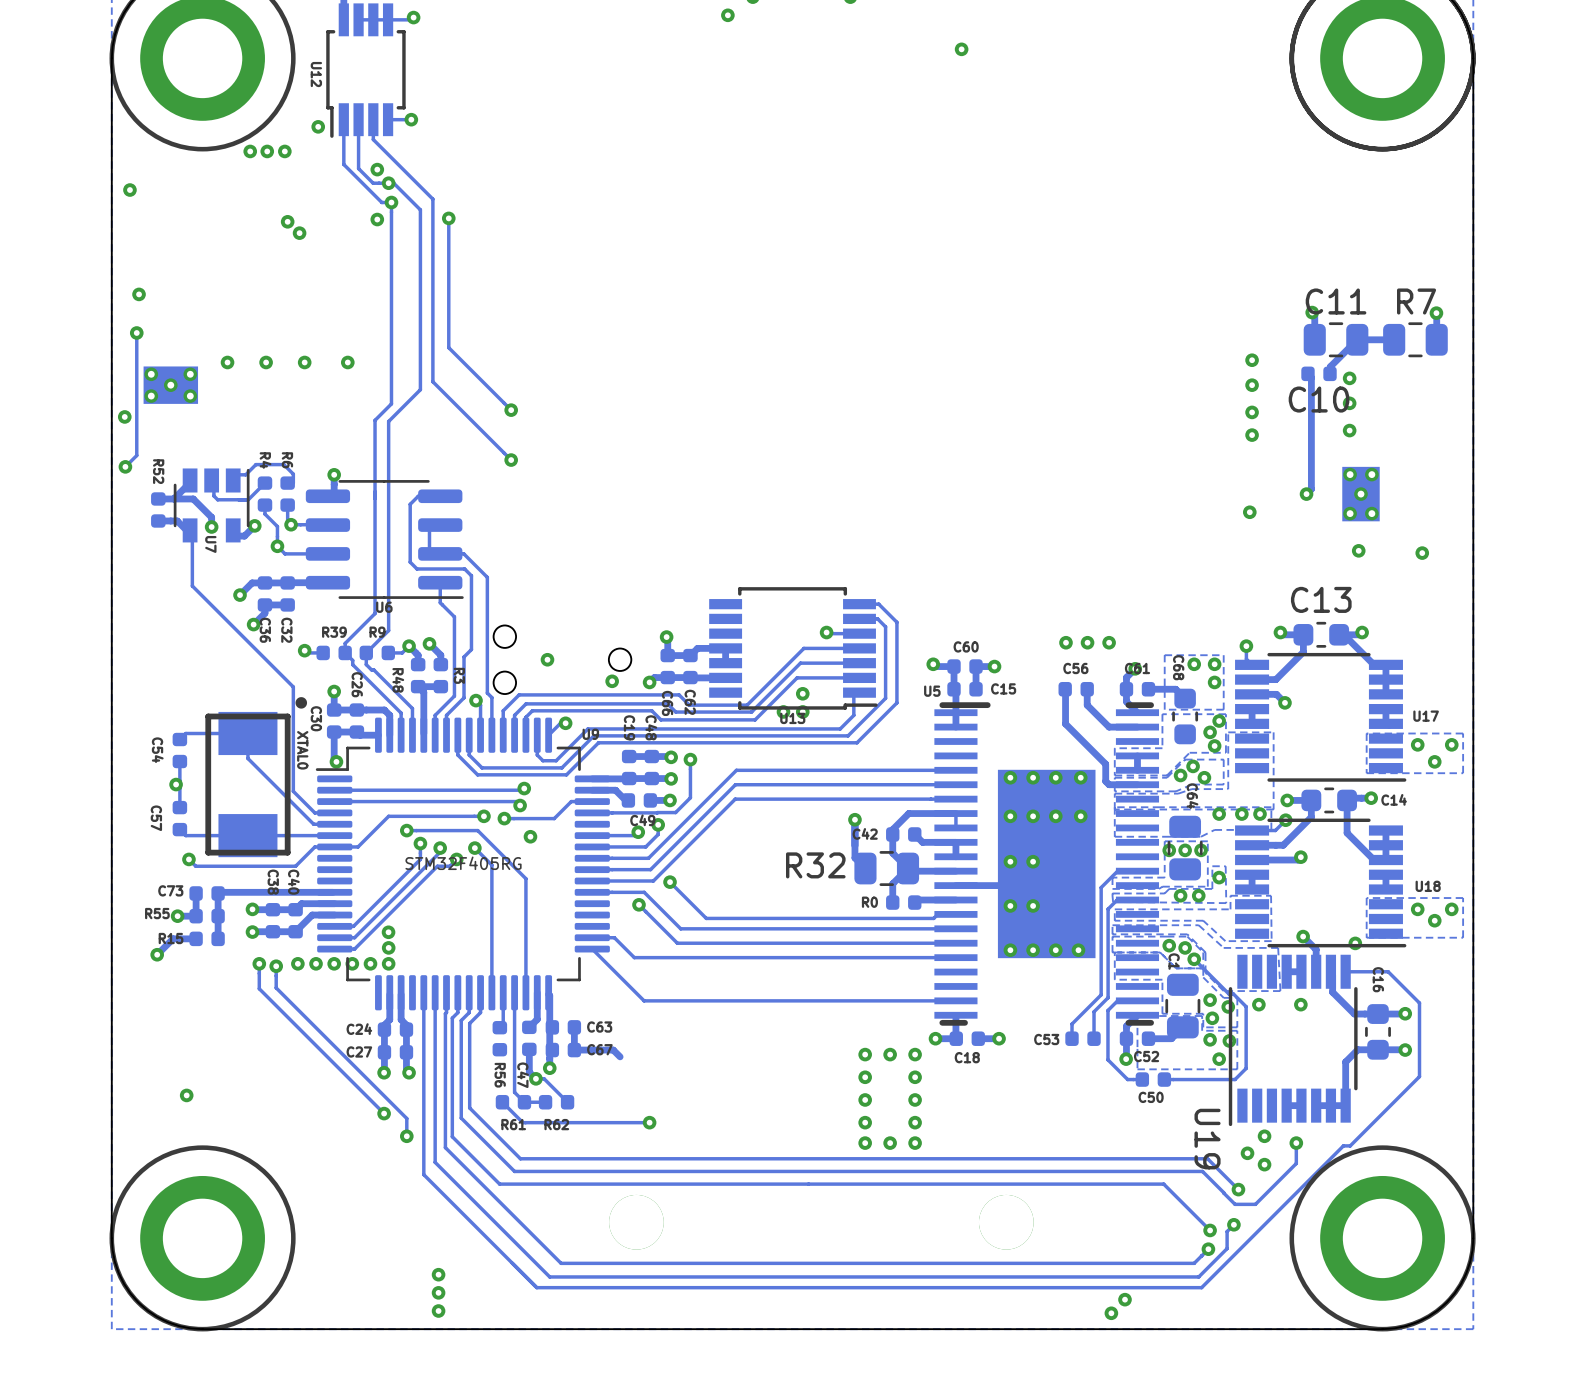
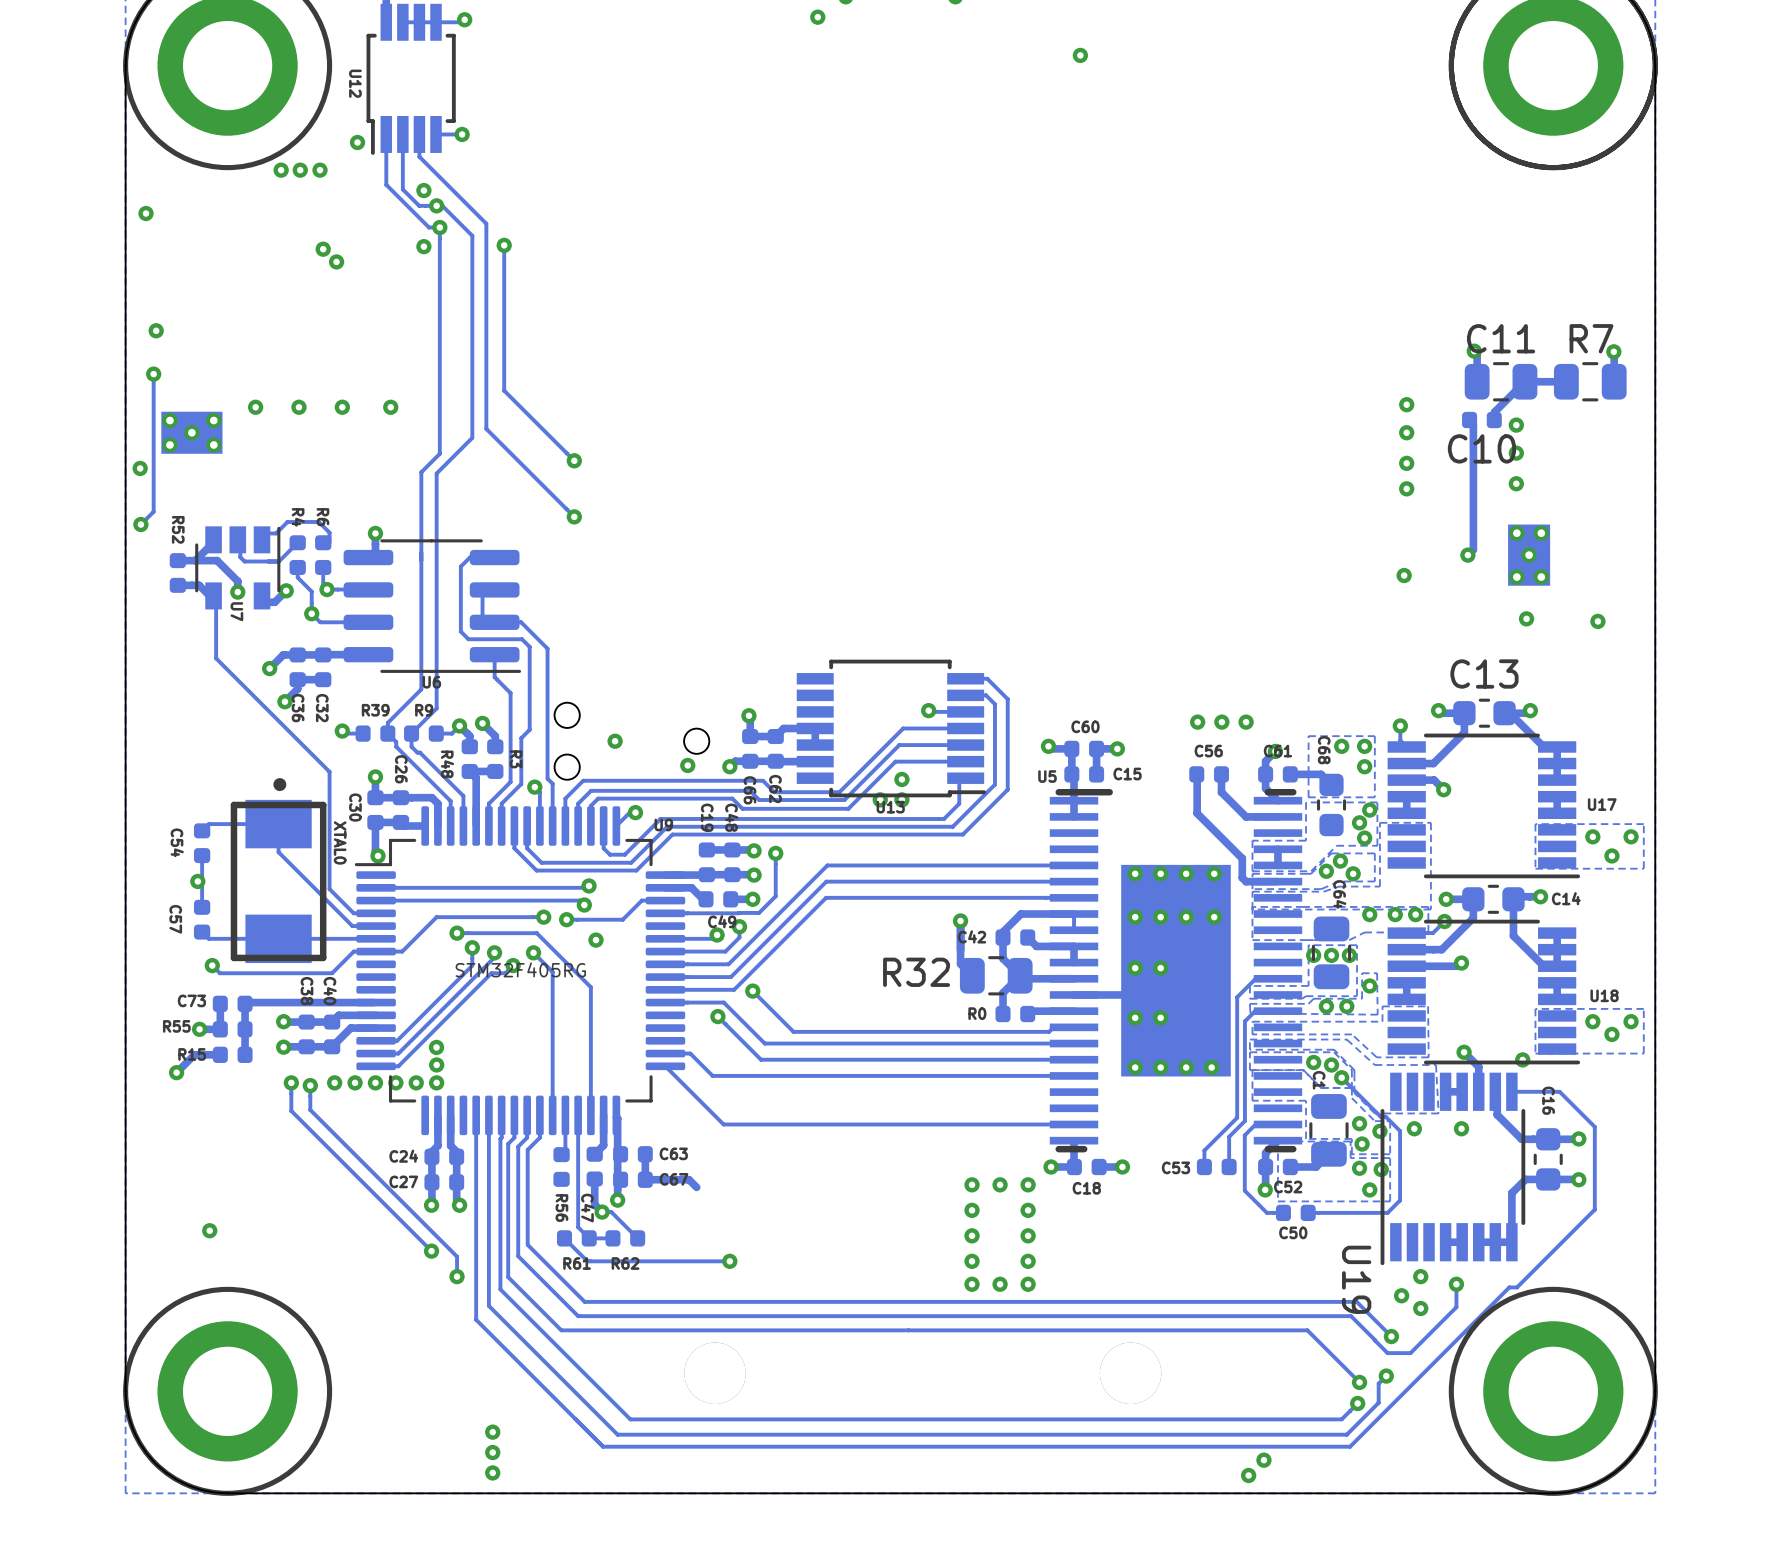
XTAL0 footprint: [205, 697, 308, 858] -> [230, 778, 327, 964]

